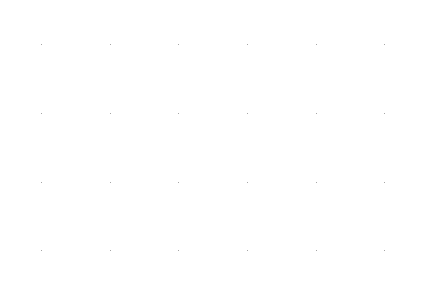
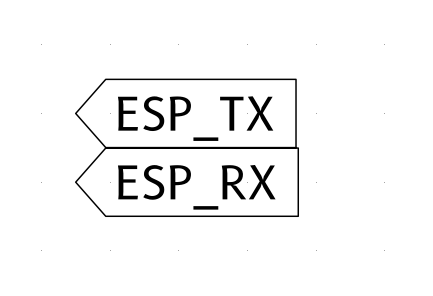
global label: none -> ESP_TX (195, 118)
global label: none -> ESP_RX (196, 187)

